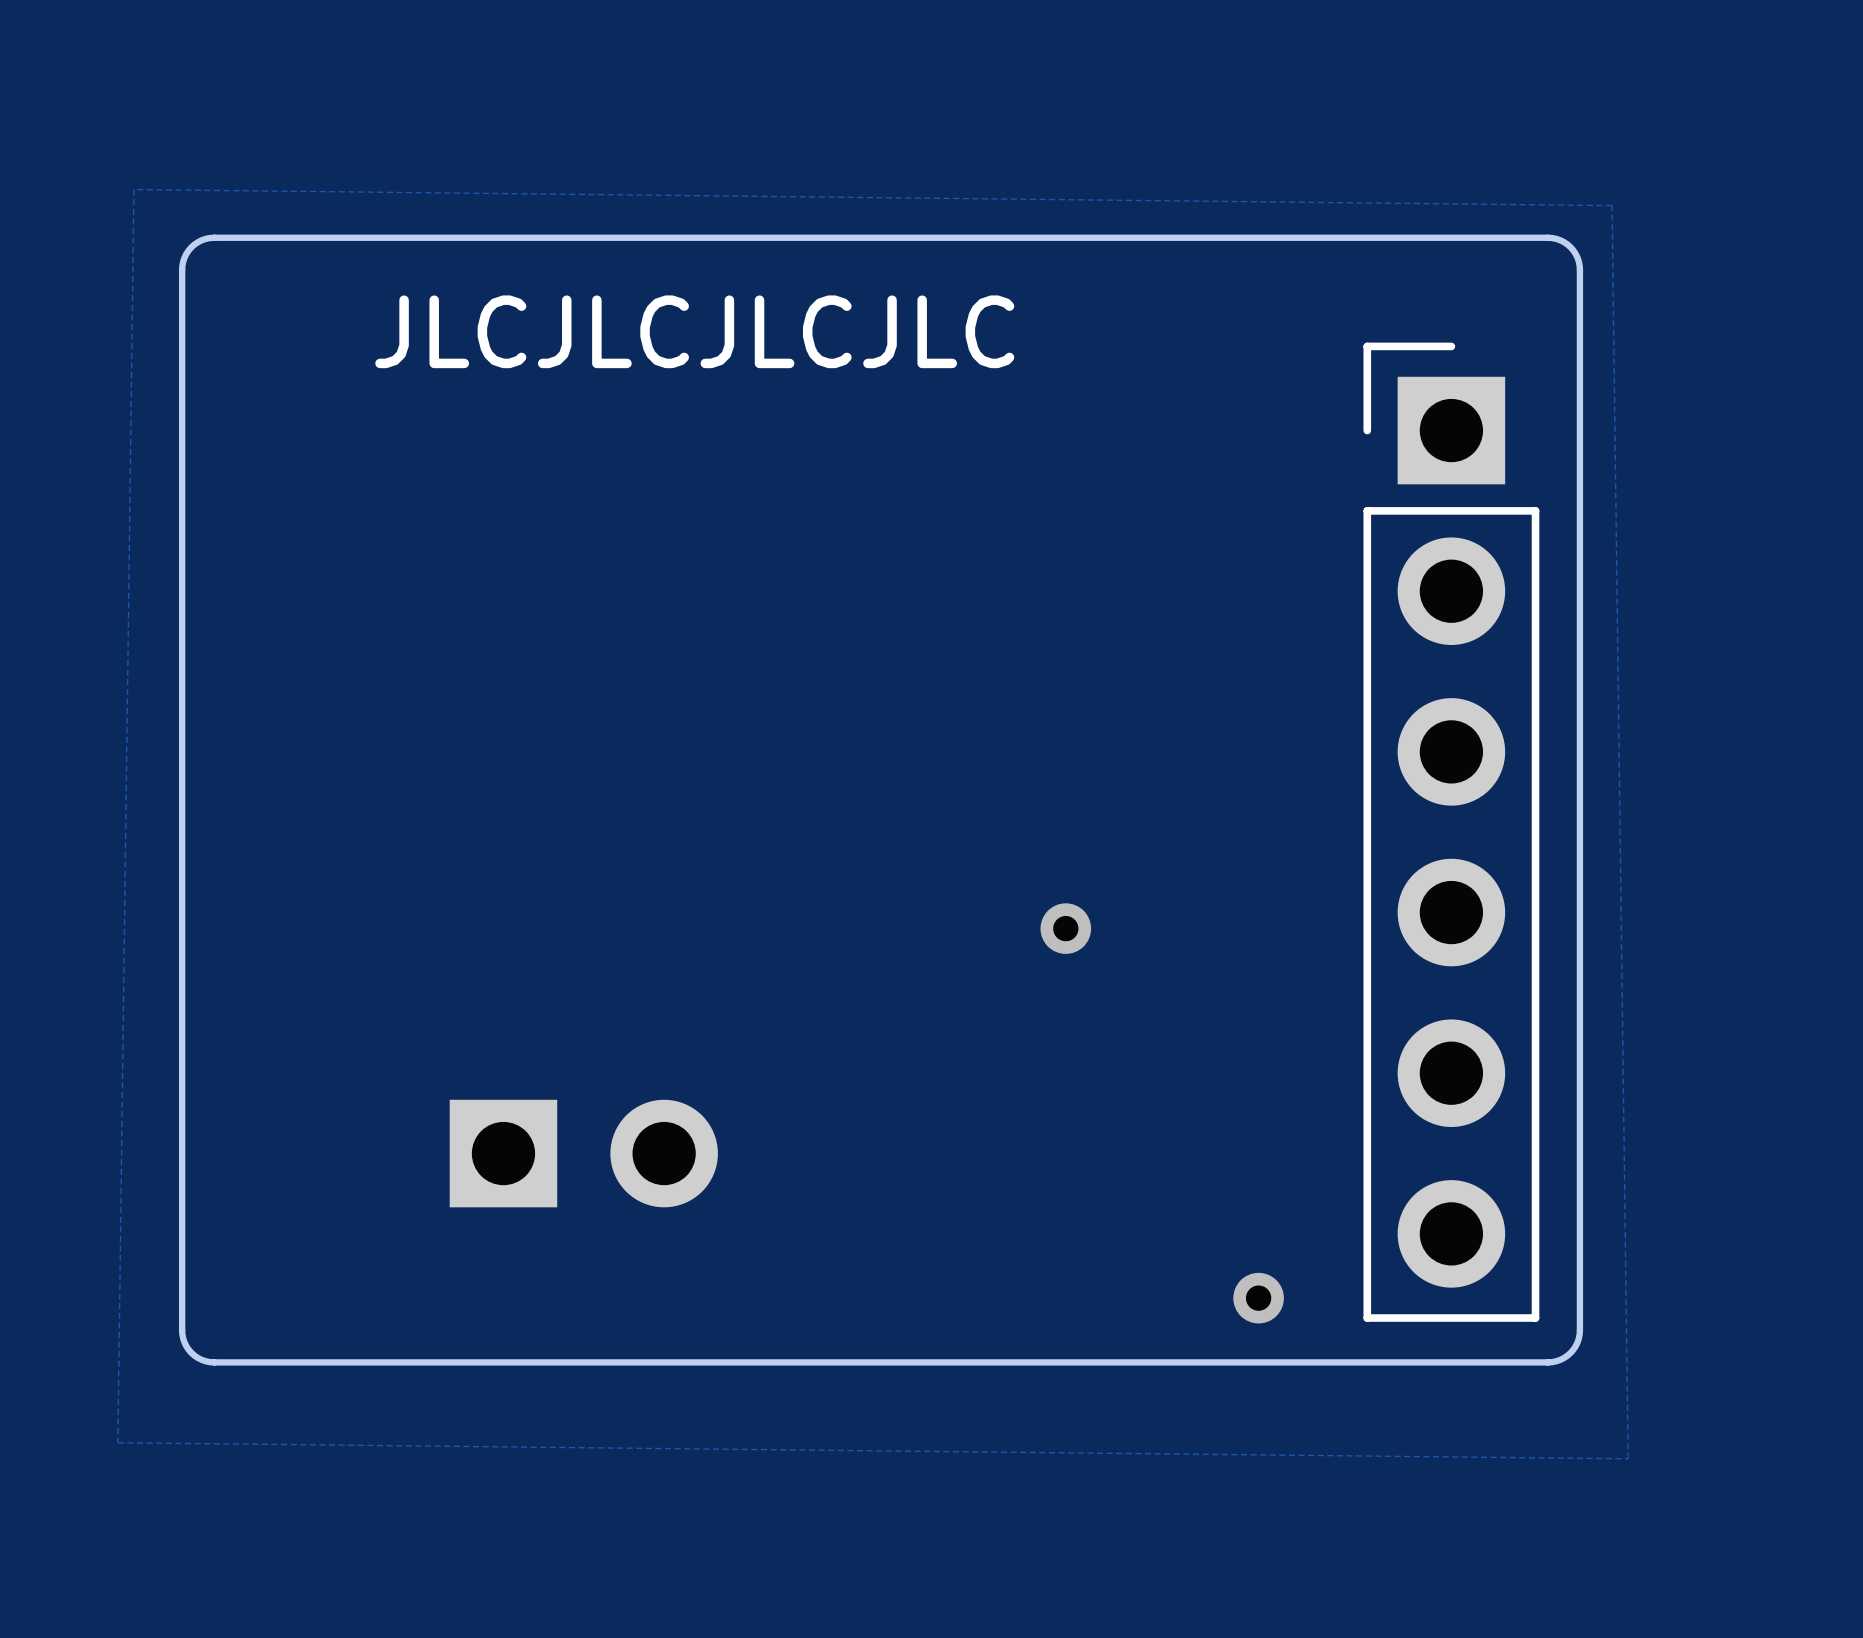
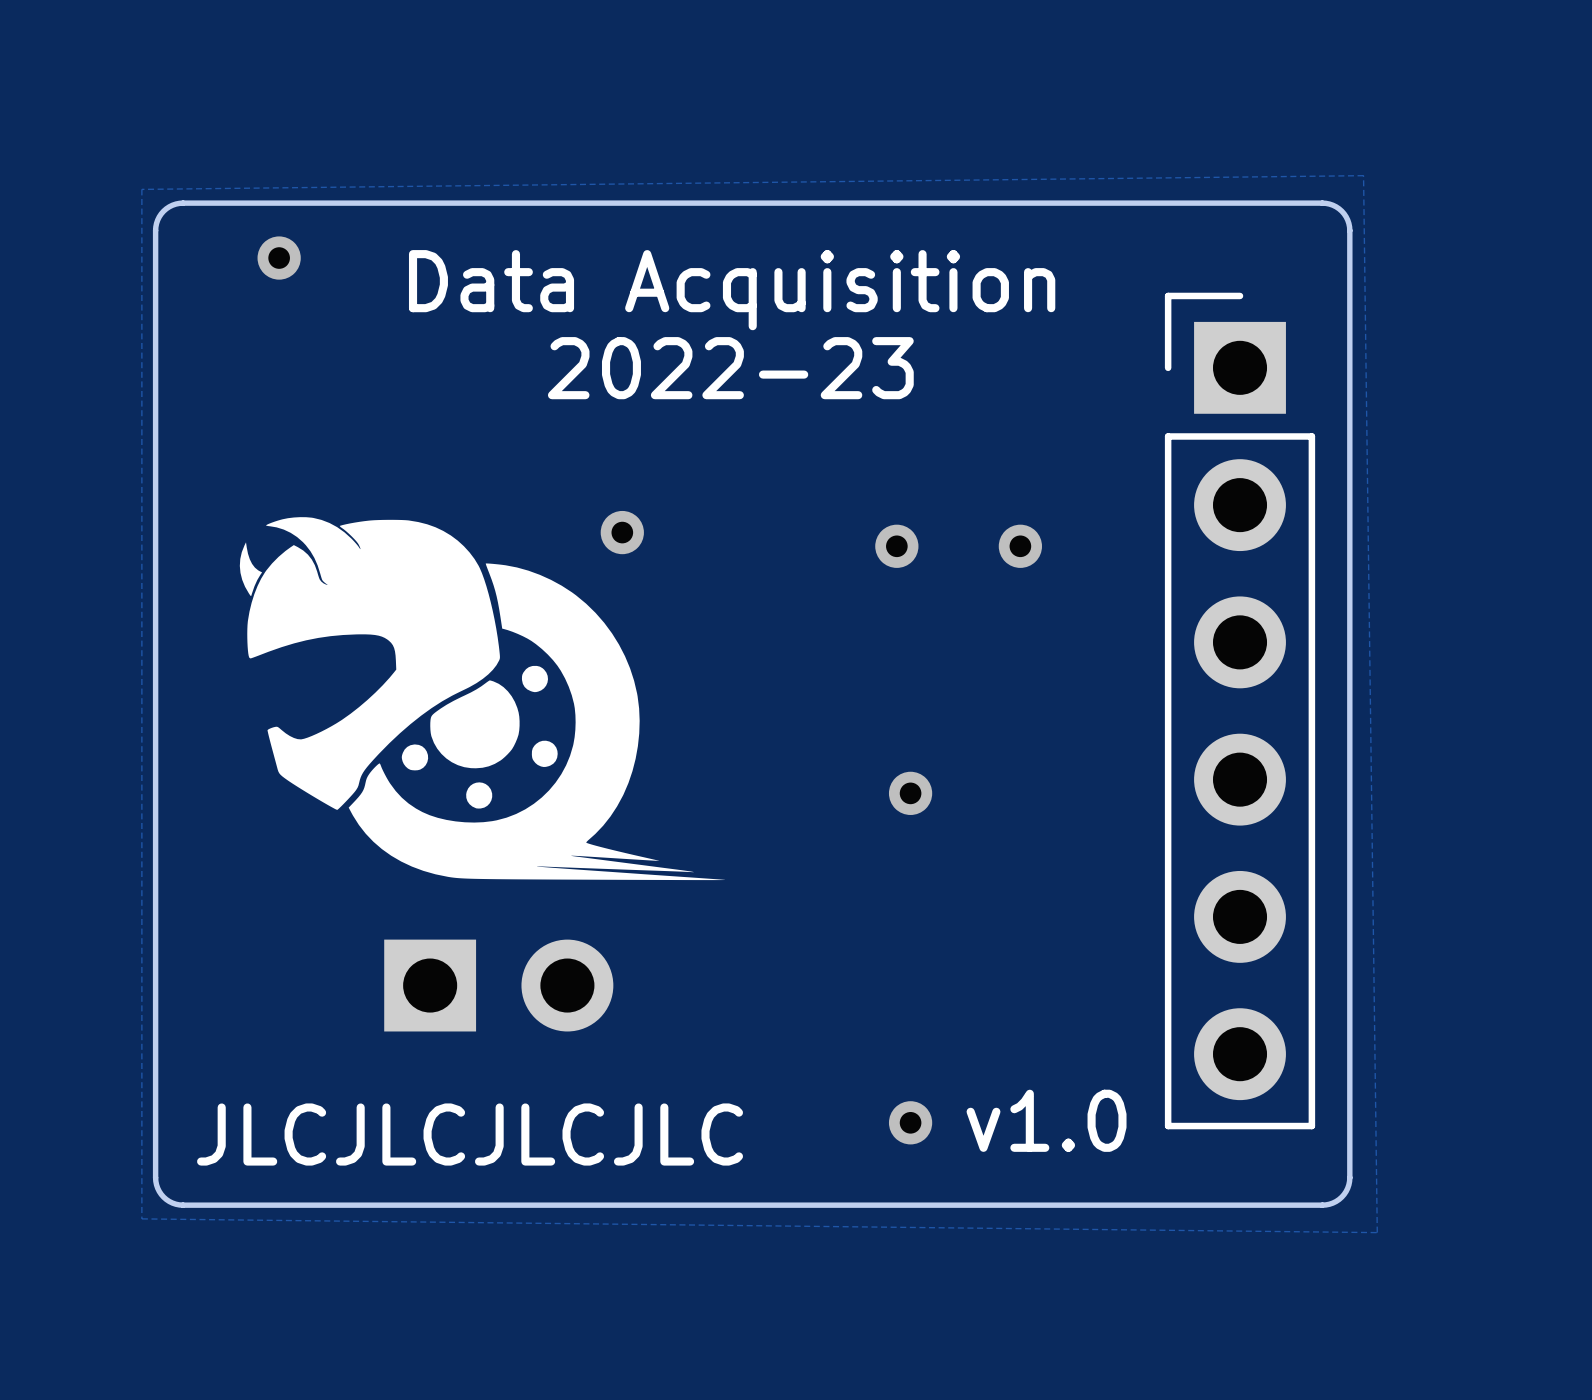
zone outline: (133, 189) (1612, 205) (1628, 1458) (117, 1442) (133, 189) -> (1363, 175) (1377, 1232) (141, 1218) (141, 189) (1363, 175)
via: none -> (279, 258)
text position: JLCJLCJLCJLC (694, 331) -> JLCJLCJLCJLC (470, 1134)
text: none -> Data Acquisition (732, 290)
text: none -> 2022-23 (730, 368)
drawing: none -> [239, 517, 726, 881]
via: none -> (622, 532)
via: none -> (896, 546)
via: none -> (1020, 546)
via position: (1258, 1298) -> (910, 1122)
text: none -> v1.0 (1046, 1120)
board edge: (1579, 1330) (1577, 1342) (1570, 1353) (1560, 1359) (1547, 1362) (214, 1362) (201, 1359) (191, 1353) (184, 1342) (182, 1330) -> (1349, 1136) (1349, 1177) (1347, 1188) (1336, 1201) (1322, 1205) (183, 1205) (166, 1199) (157, 1188) (155, 1177) (155, 1136)

